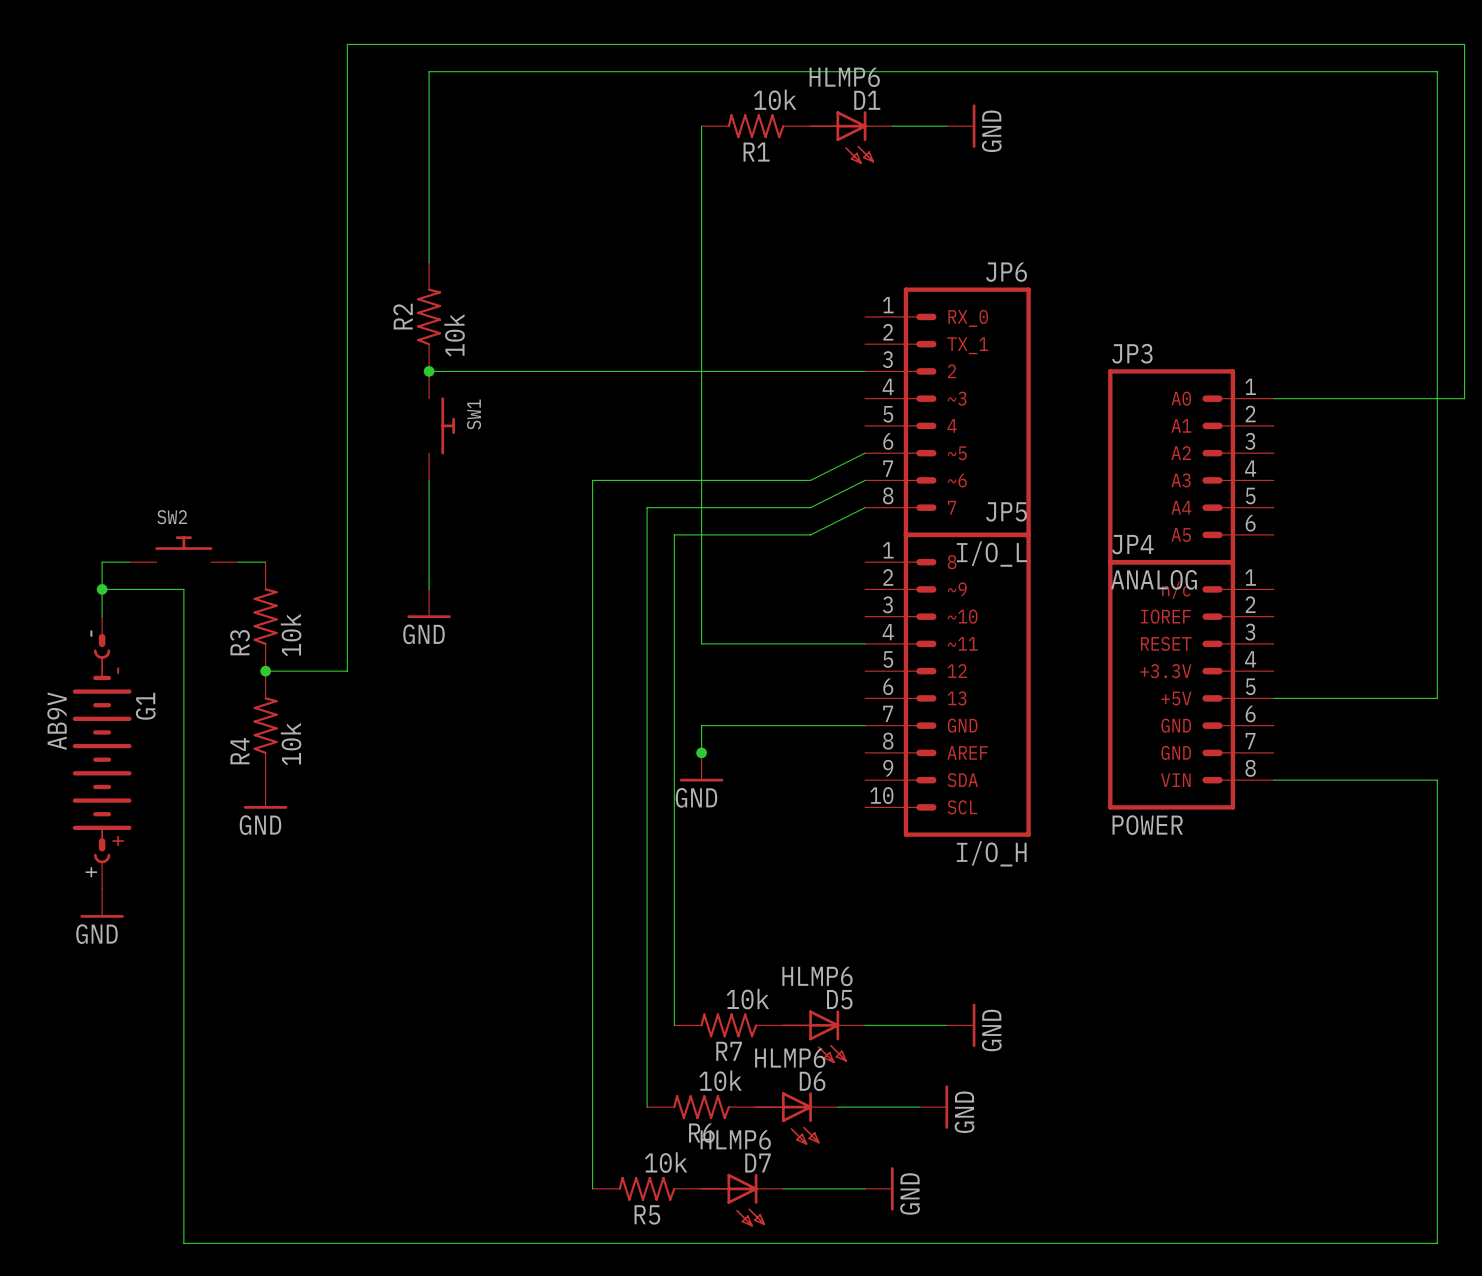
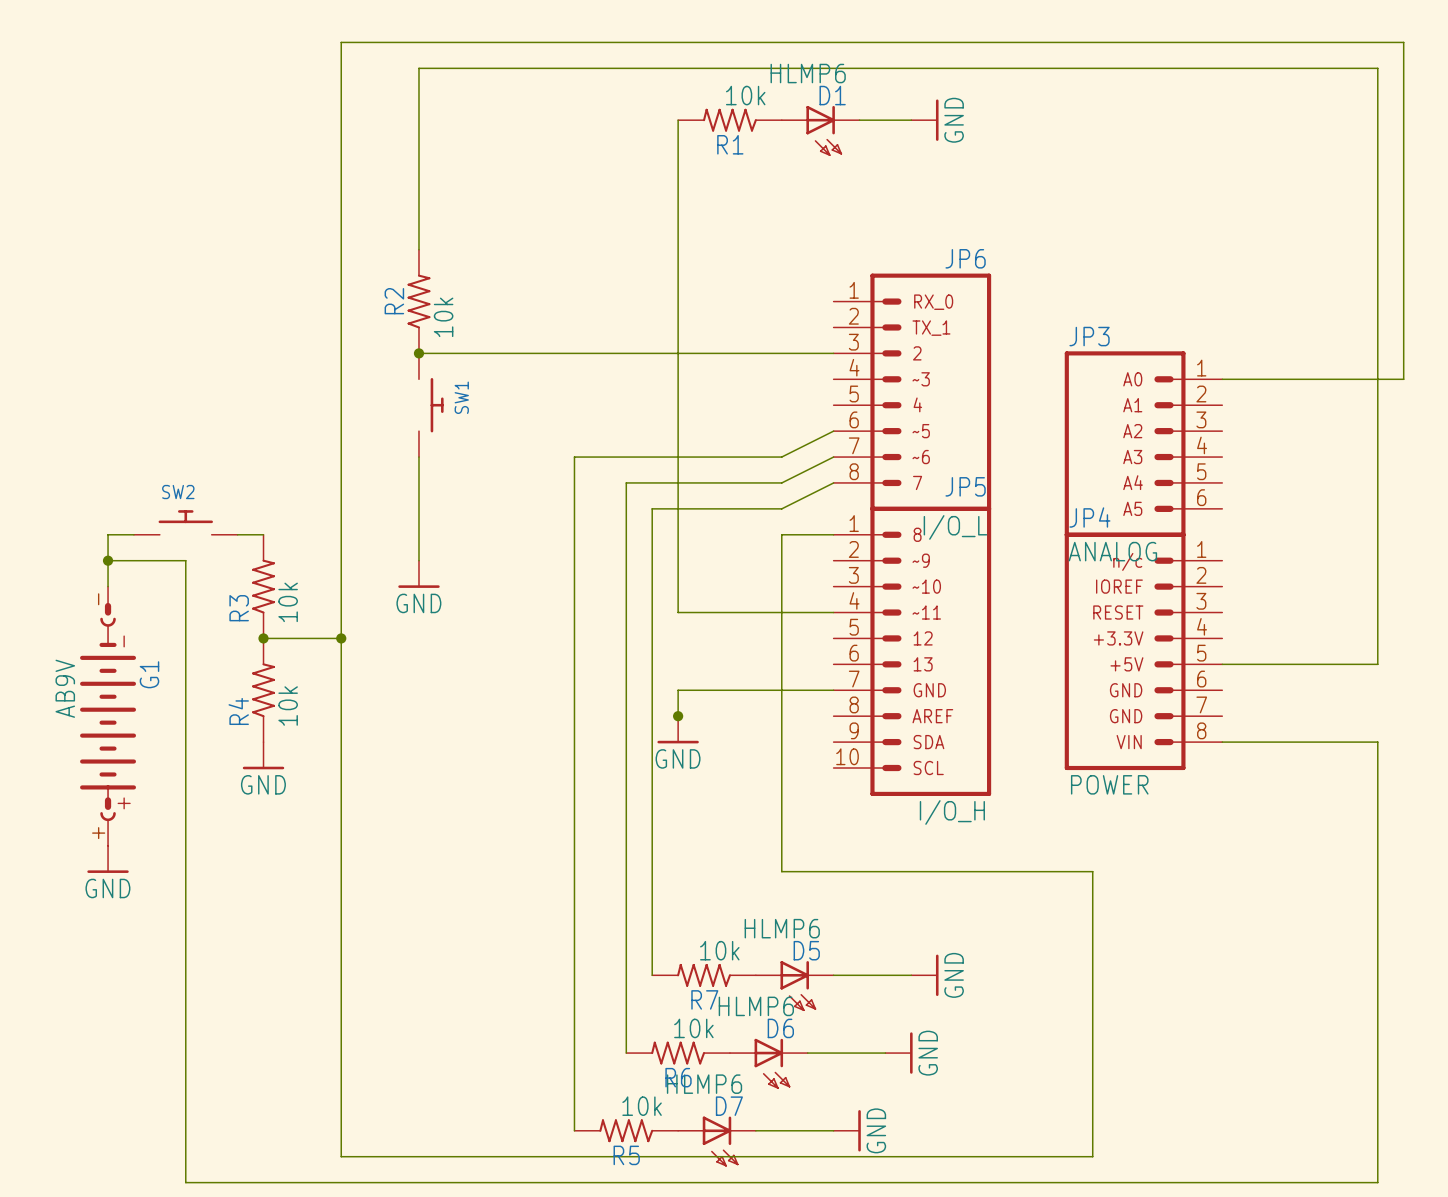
wire: none -> (833, 534) (781, 534) (781, 871) (1092, 871) (1092, 1156) (341, 1156) (341, 638)
junction: none -> (341, 638)

